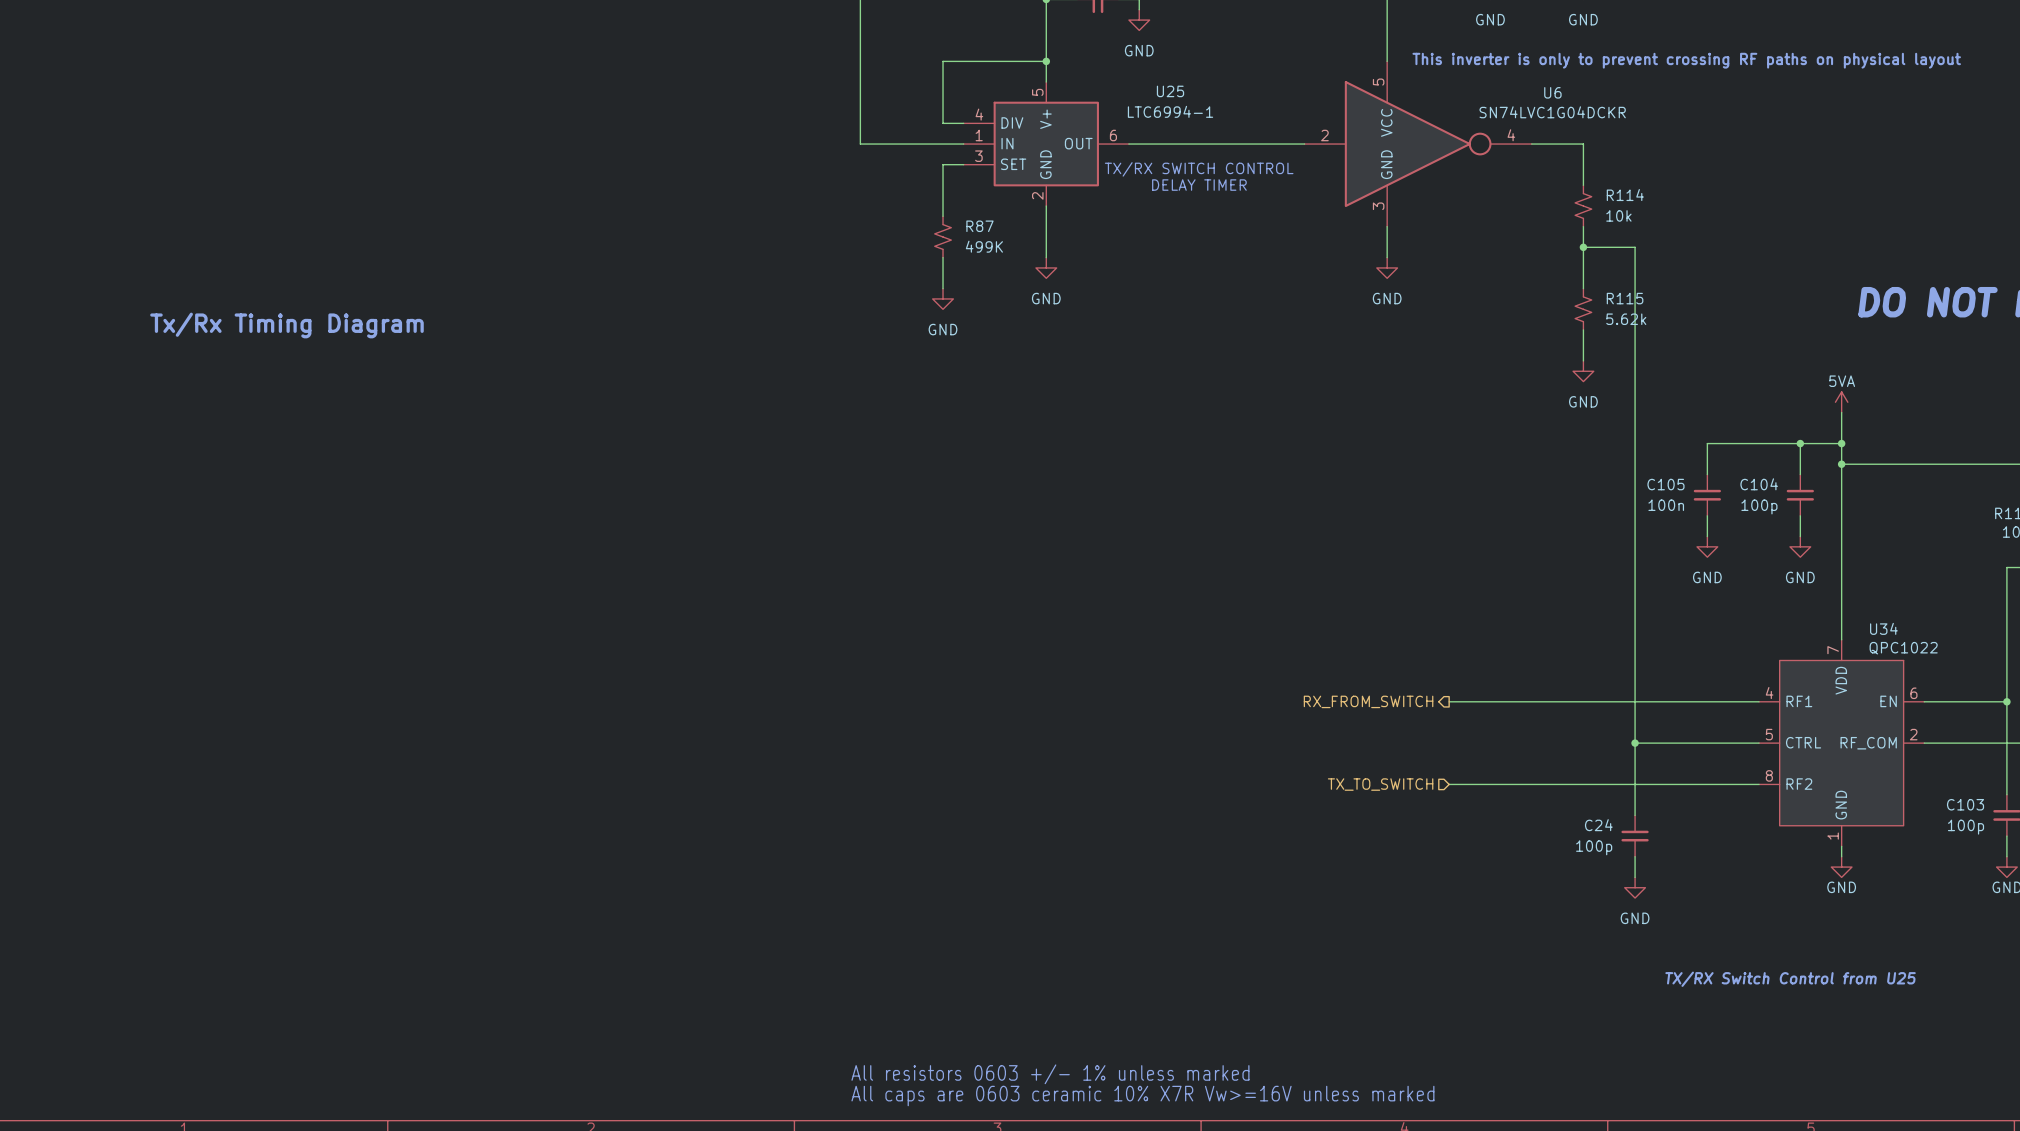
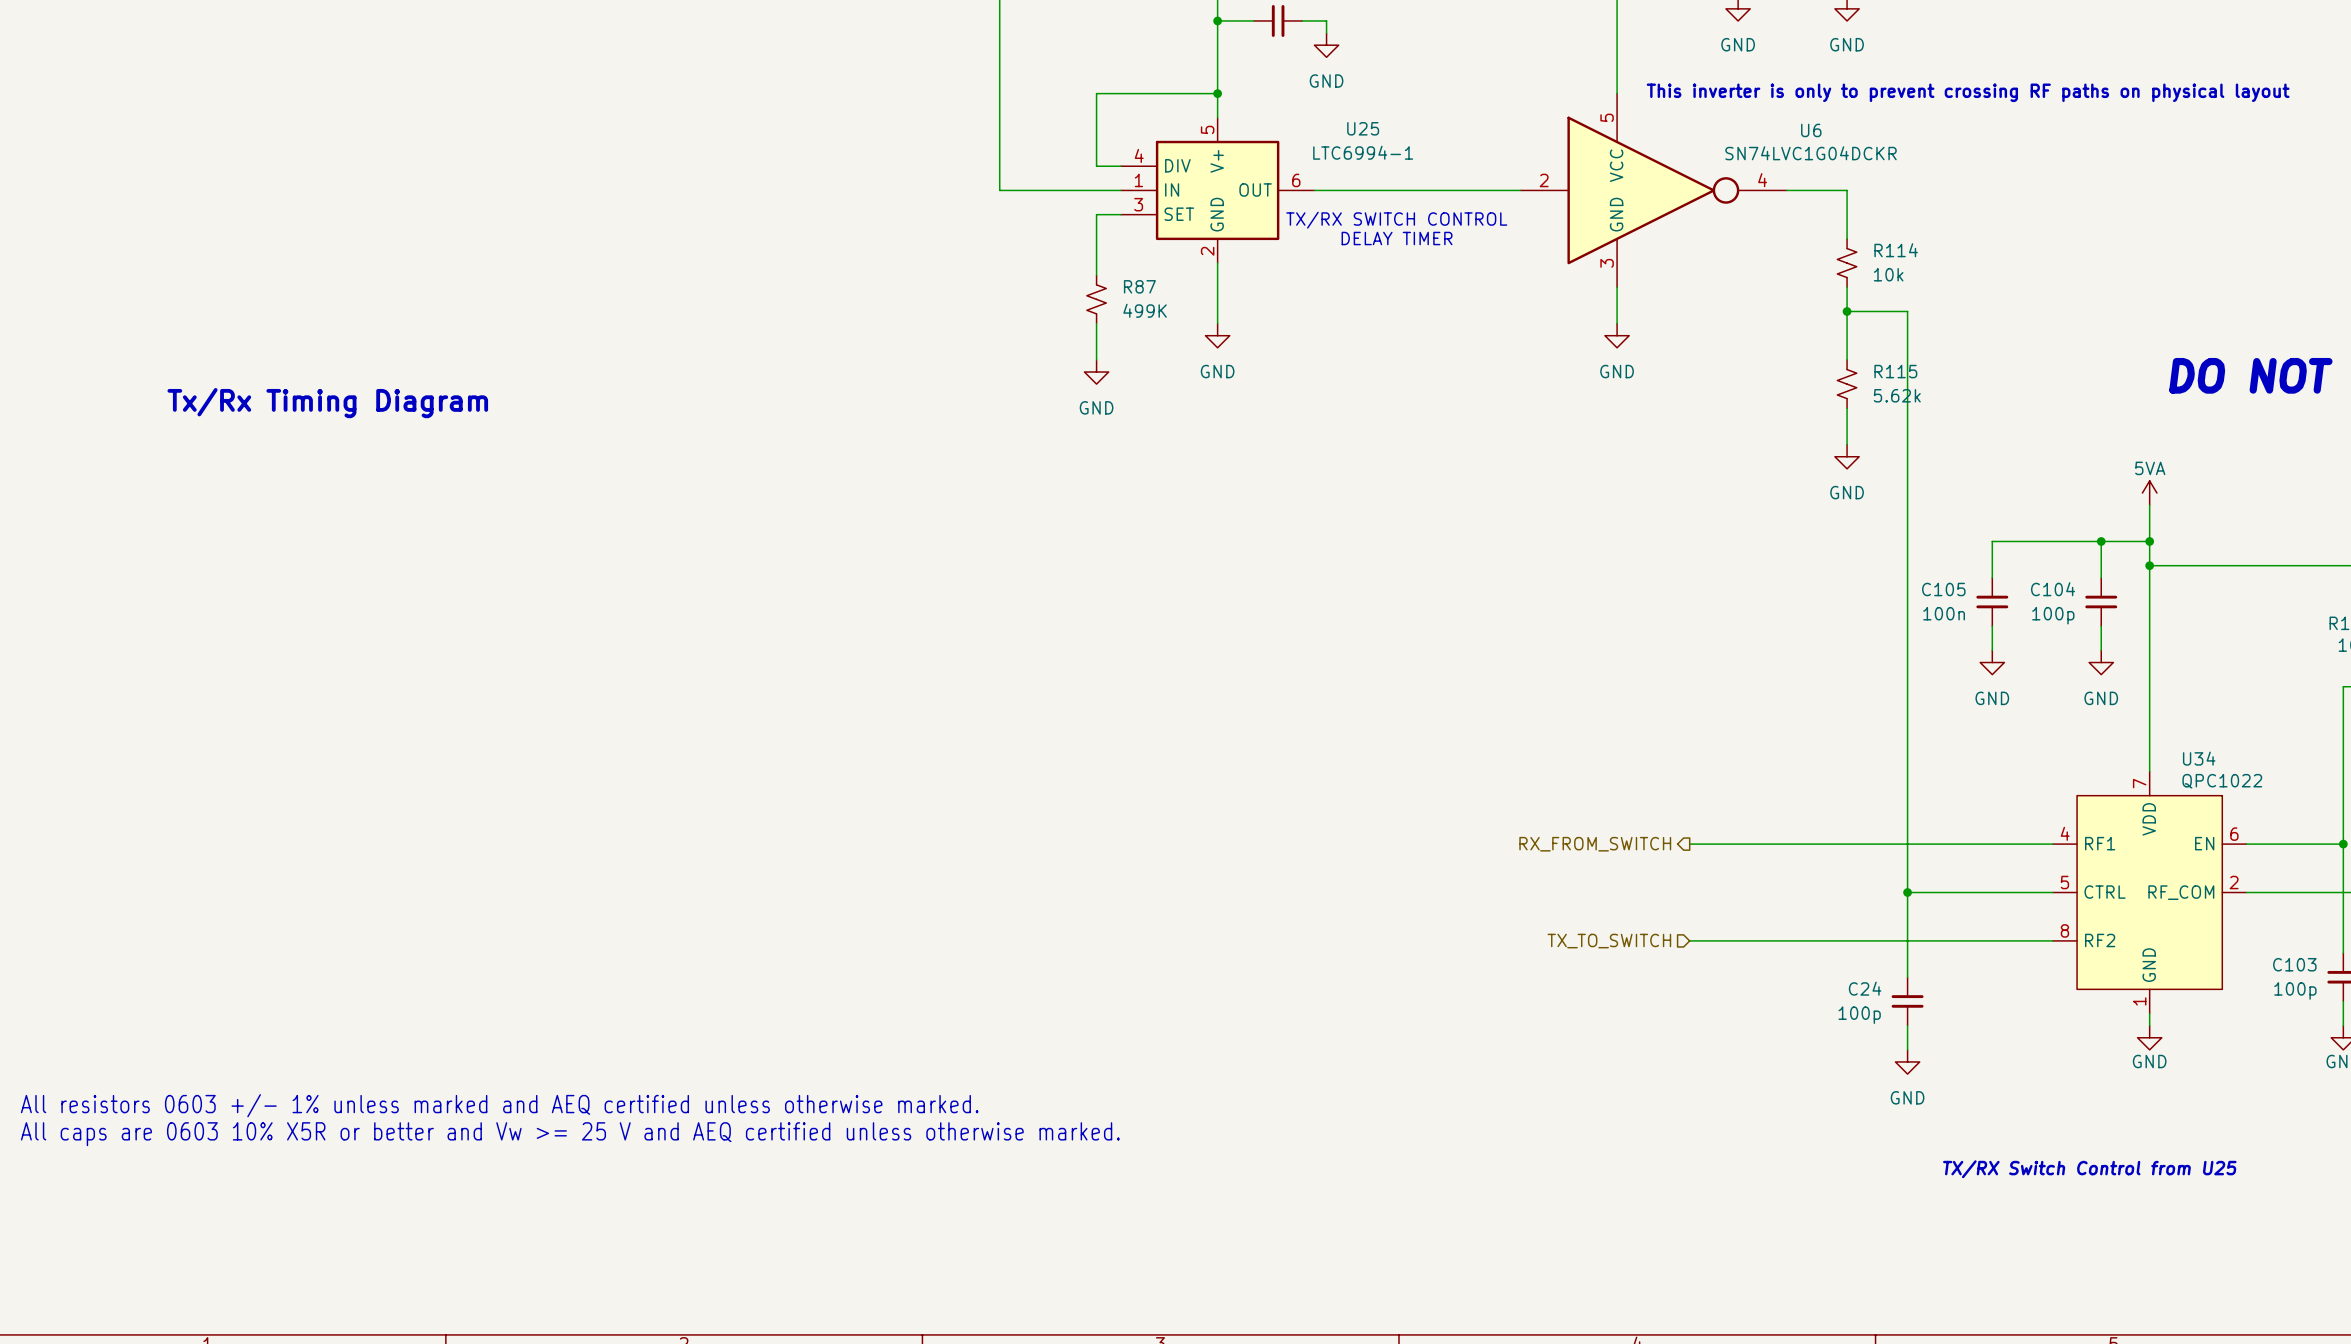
text: none -> All resistors 0603 +/- 1% unless marked and AEQ certified unless otherwise marked. (499, 1105)
text: none -> All caps are 0603 10% X5R or better and Vw >= 25 V and AEQ certified unless otherwise marked. (570, 1134)
text: All resistors 0603 +/- 1% unless marked (1050, 1074) -> none
text: All caps are 0603 ceramic 10% X7R Vw>=16V unless marked (1142, 1096) -> none

